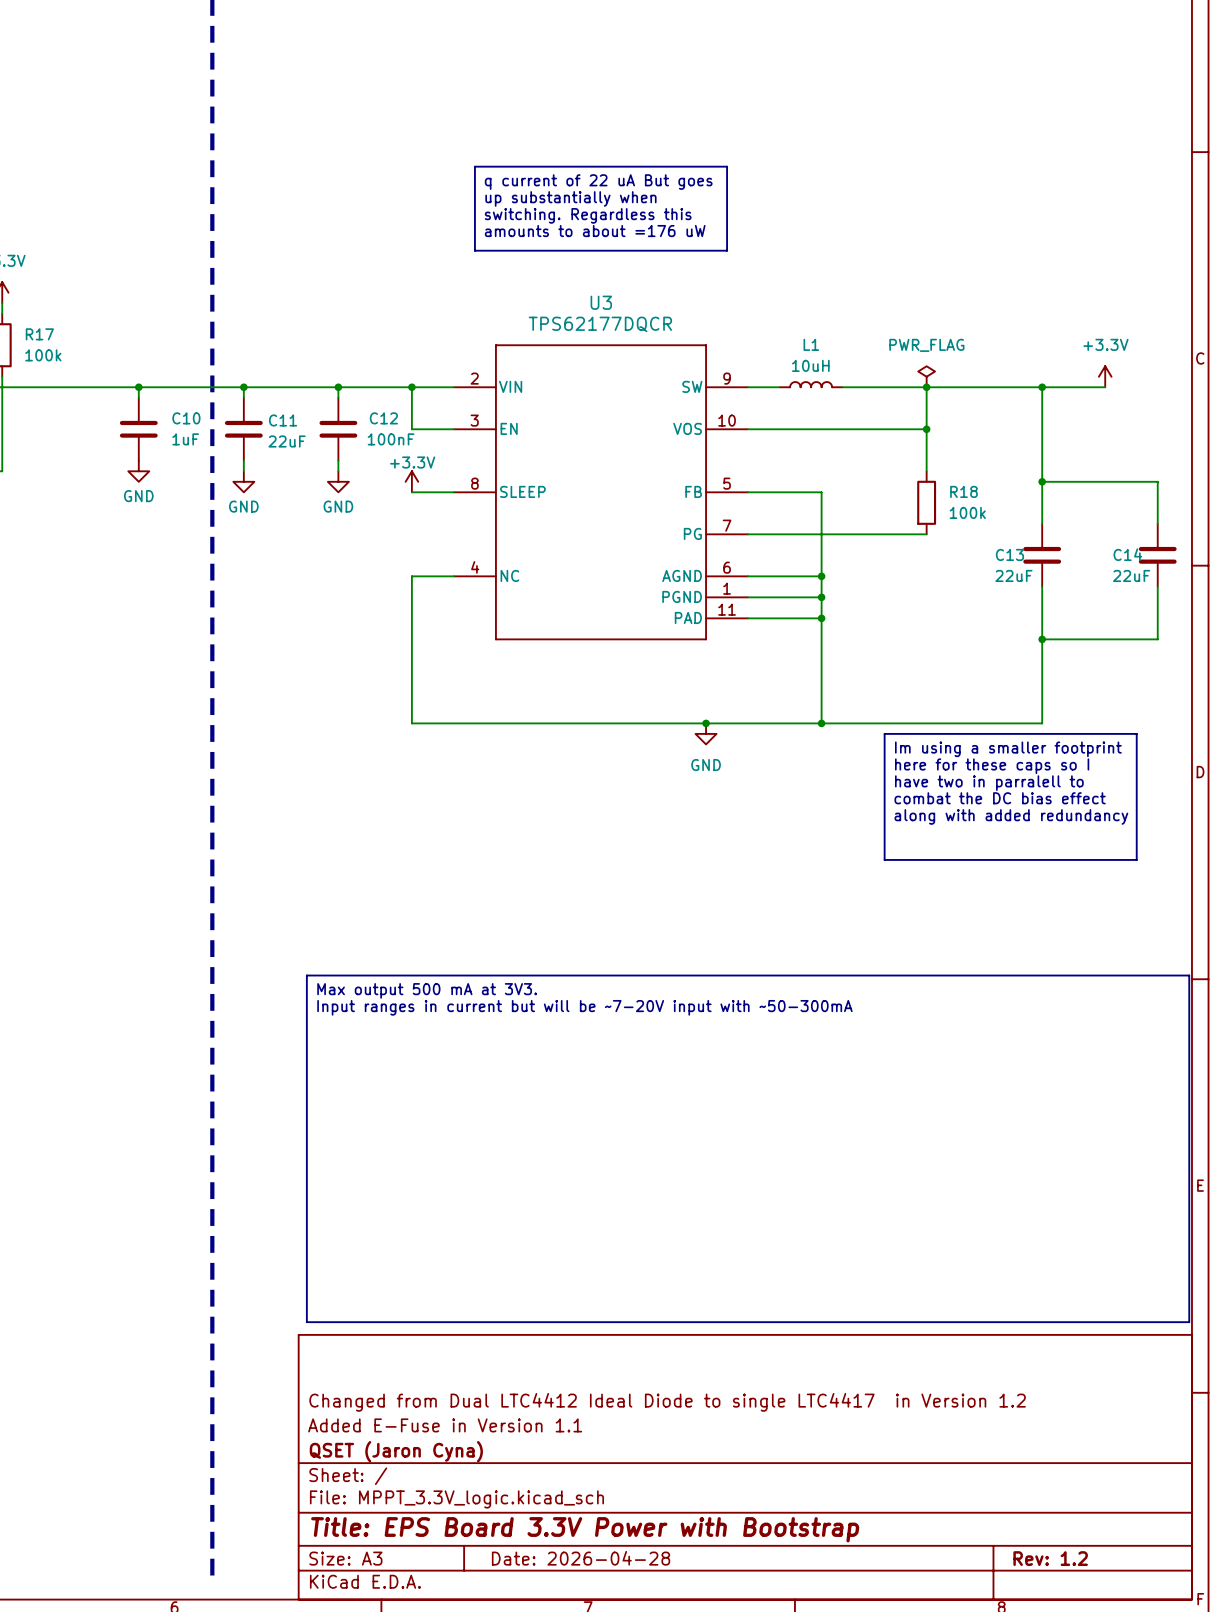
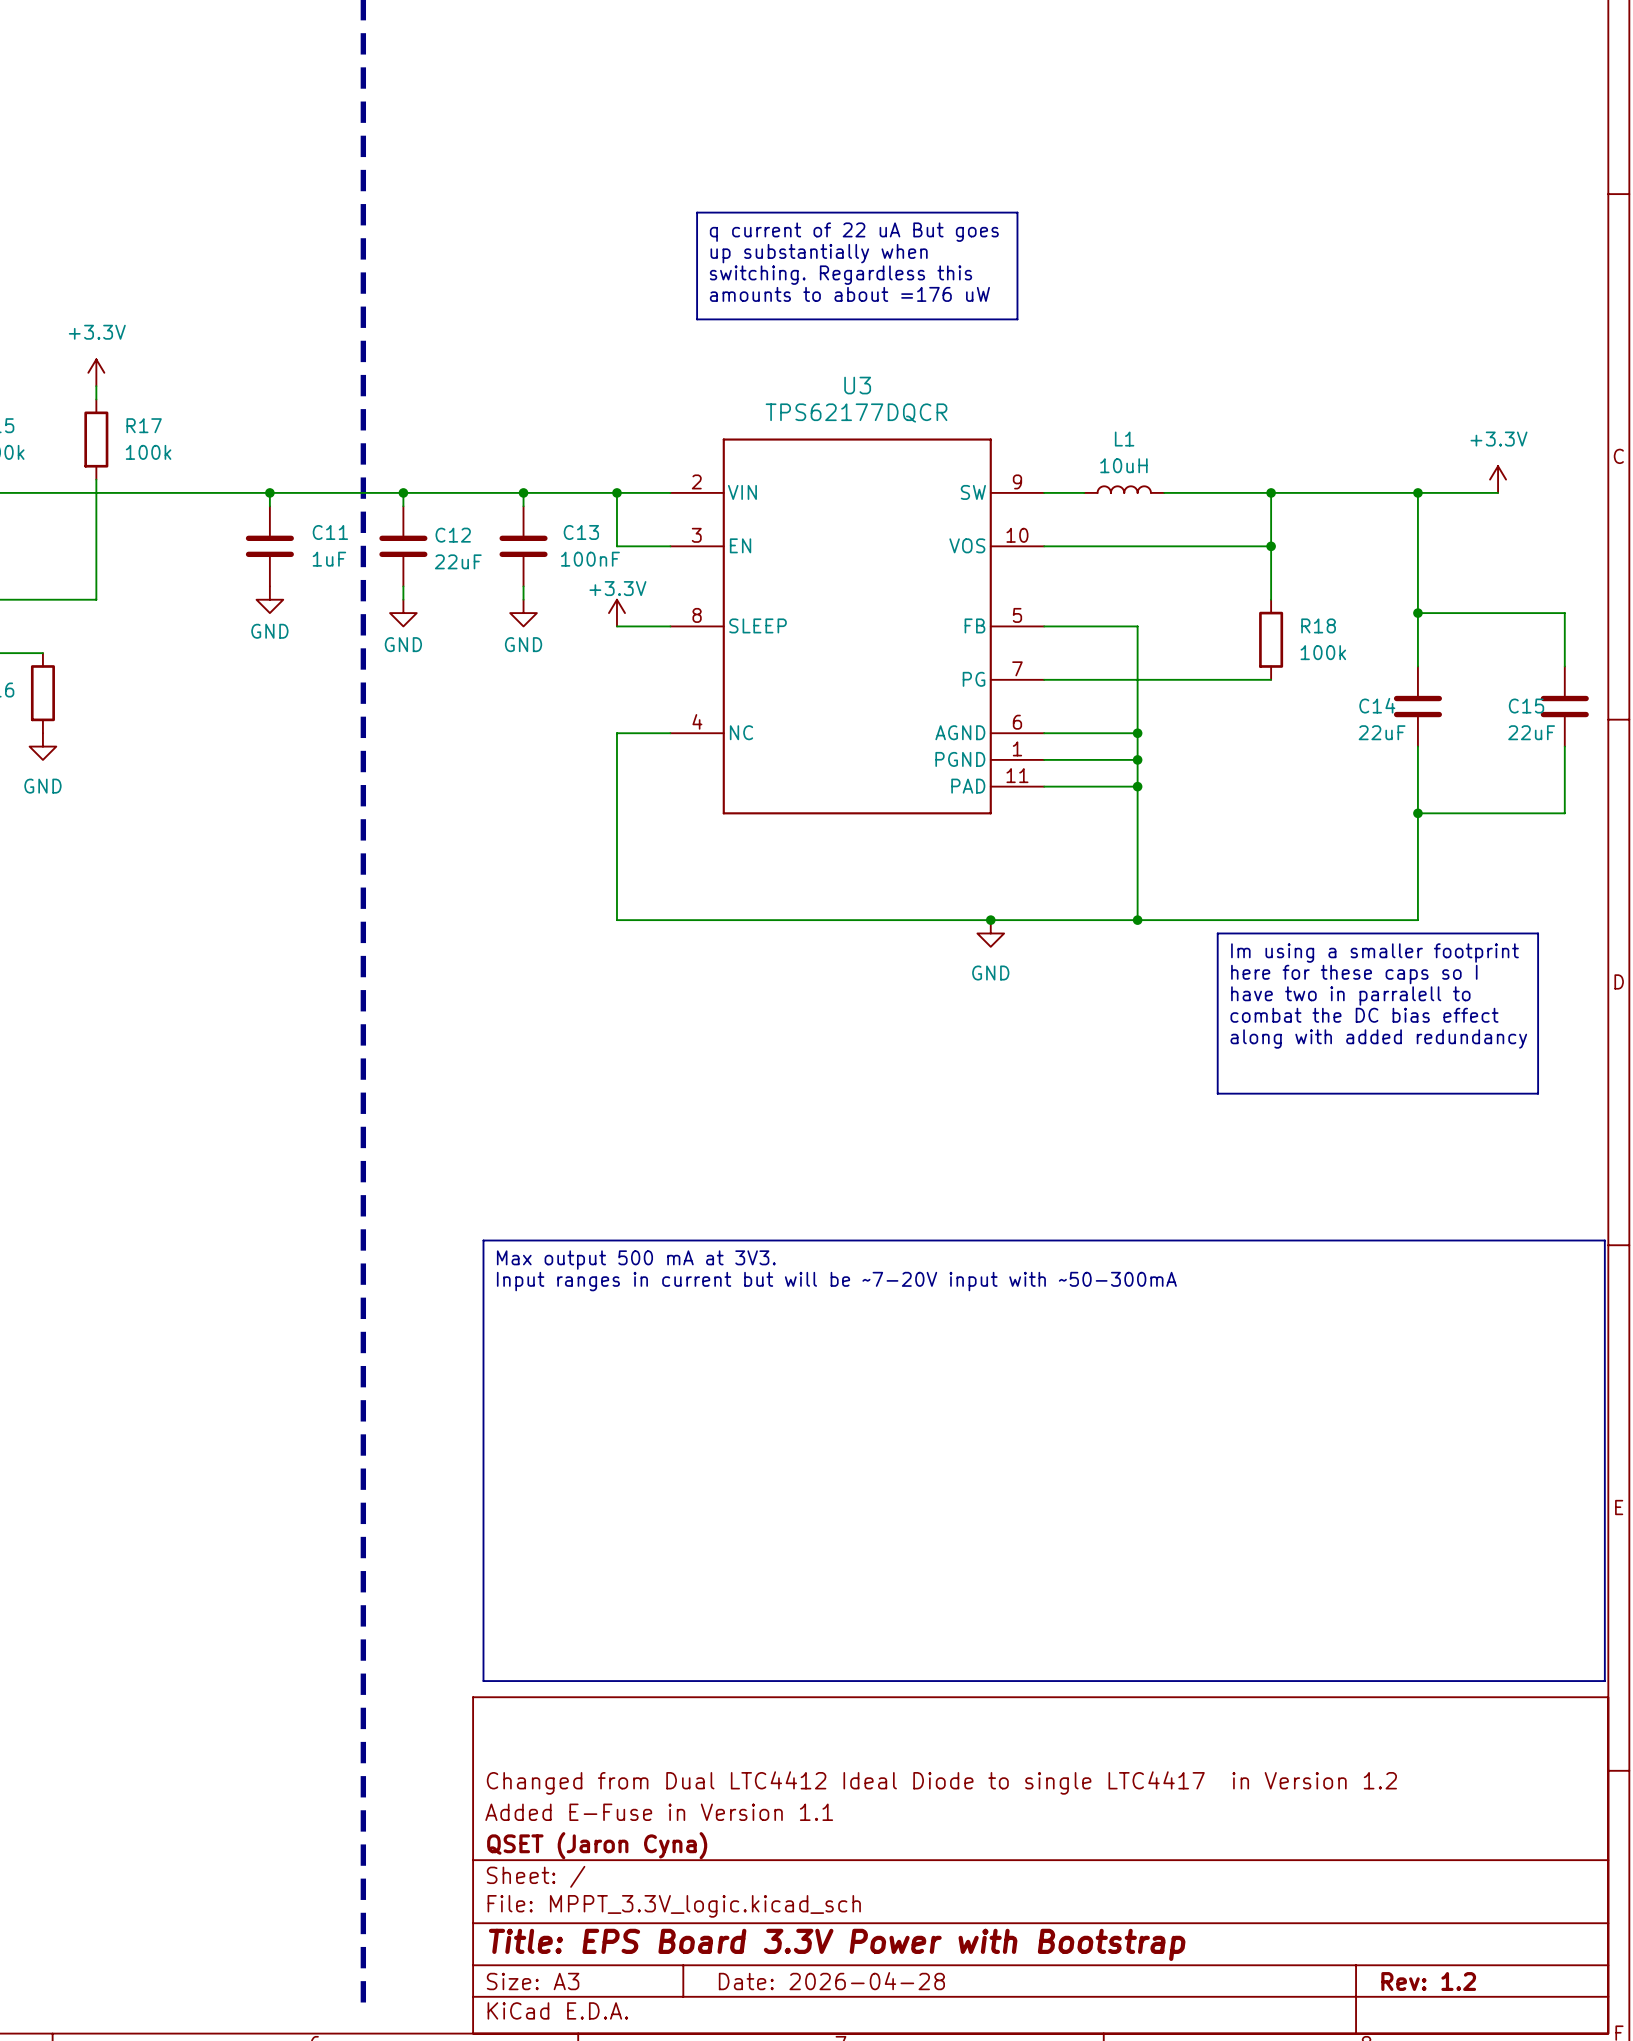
power symbol: PWR_FLAG (926, 376) -> none
C10 name: C10 (186, 418) -> C11 (330, 532)
C12 name: C12 (383, 418) -> C13 (581, 532)
C11 name: C11 (283, 420) -> C12 (453, 535)
C13 name: C13 (1009, 554) -> C14 (1377, 705)
C14 name: C14 (1127, 554) -> C15 (1526, 706)

